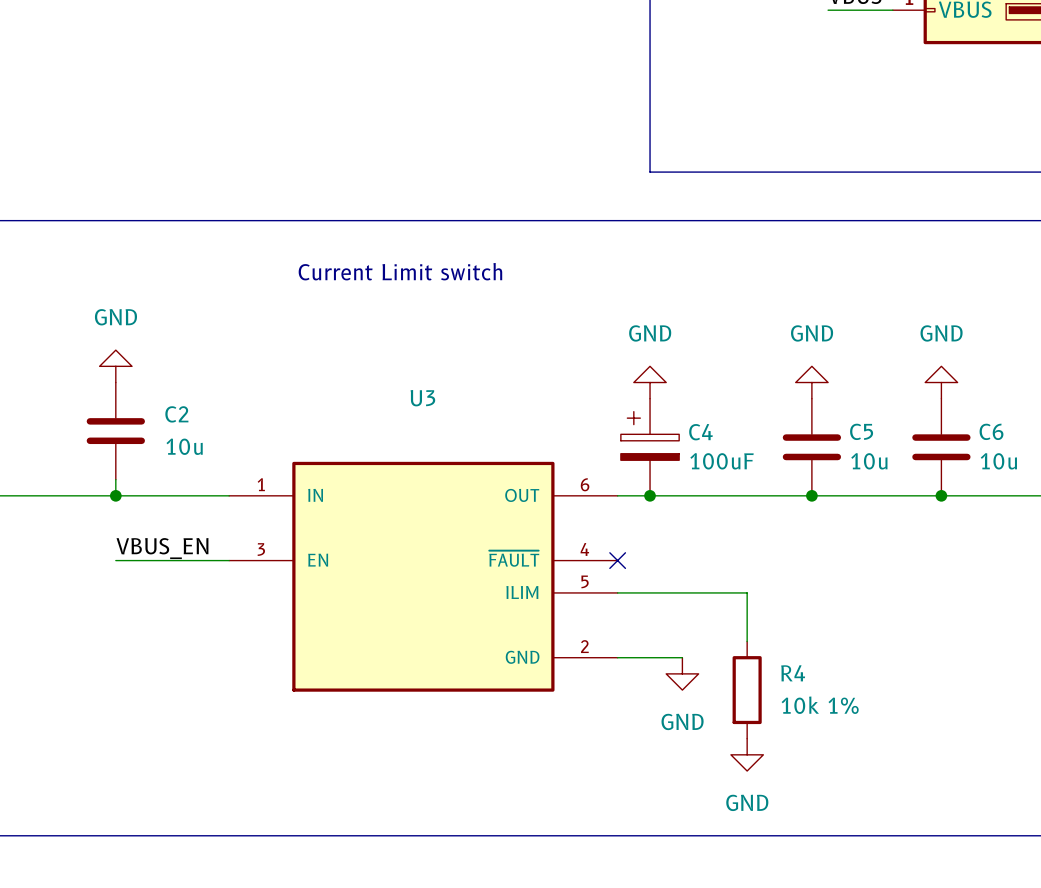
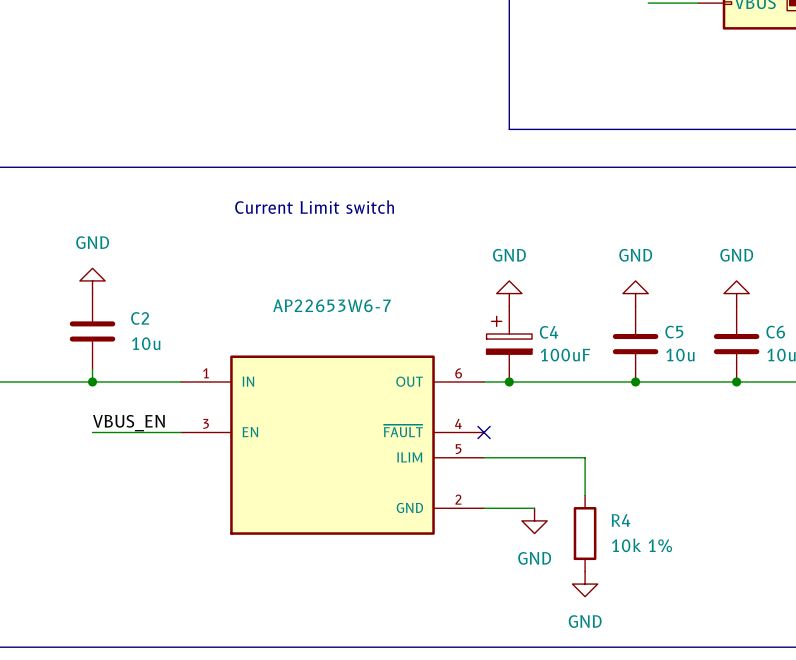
U3 name: U3 (422, 398) -> AP22653W6-7 (331, 305)

